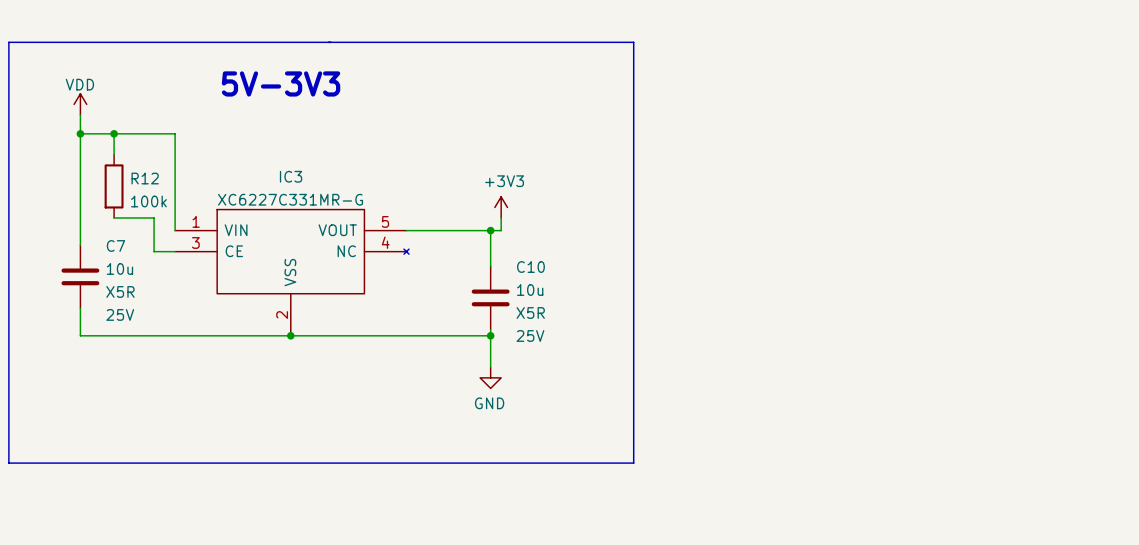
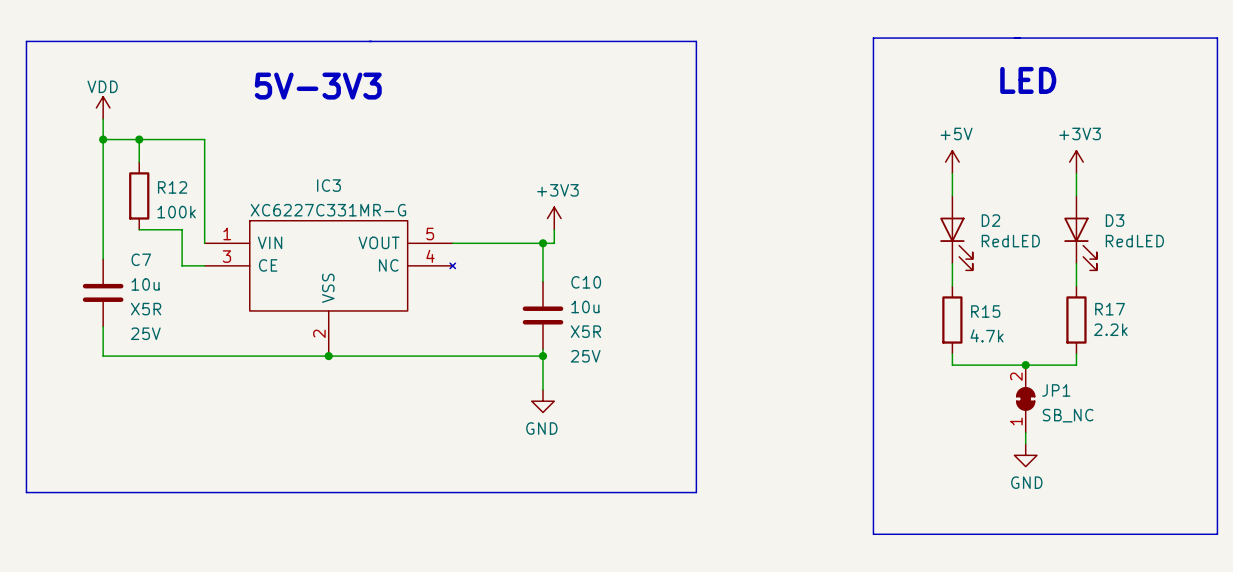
line: none -> (873, 38) (873, 534) (1217, 534) (1217, 38) (873, 38)
text: none -> LED (1028, 80)
power symbol: none -> +5V (952, 162)
power symbol: none -> +3V3 (1076, 162)
wire: none -> (952, 173) (952, 195)
wire: none -> (1076, 173) (1076, 195)
D2: none -> RedLED (956, 233)
D3: none -> RedLED (1080, 233)
wire: none -> (952, 263) (952, 286)
wire: none -> (1076, 263) (1076, 286)
R15: none -> 4.7k (952, 320)
R17: none -> 2.2k (1076, 320)
wire: none -> (952, 353) (952, 365) (1076, 365) (1076, 353)
junction: none -> (1025, 365)
JP1: none -> SB_NC (1025, 398)
wire: none -> (1025, 432) (1025, 444)
power symbol: none -> GND (1025, 455)

